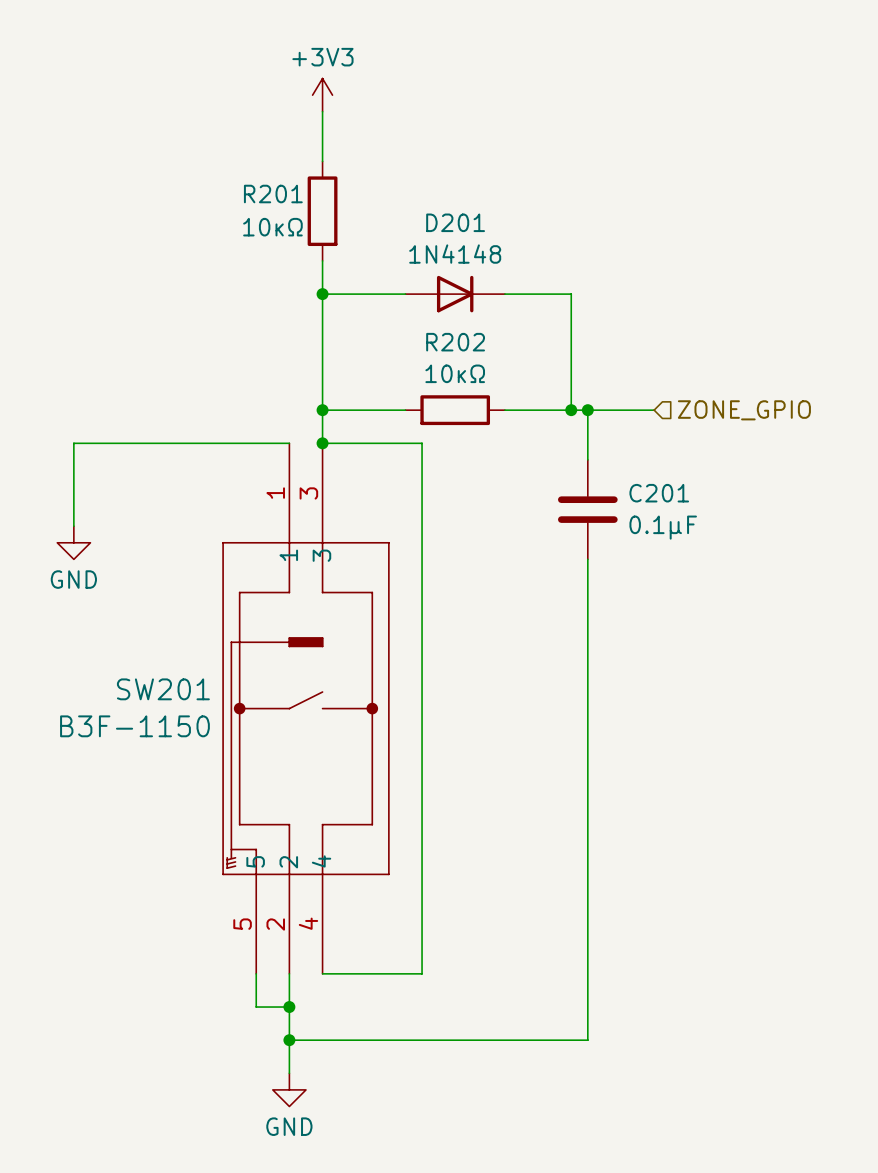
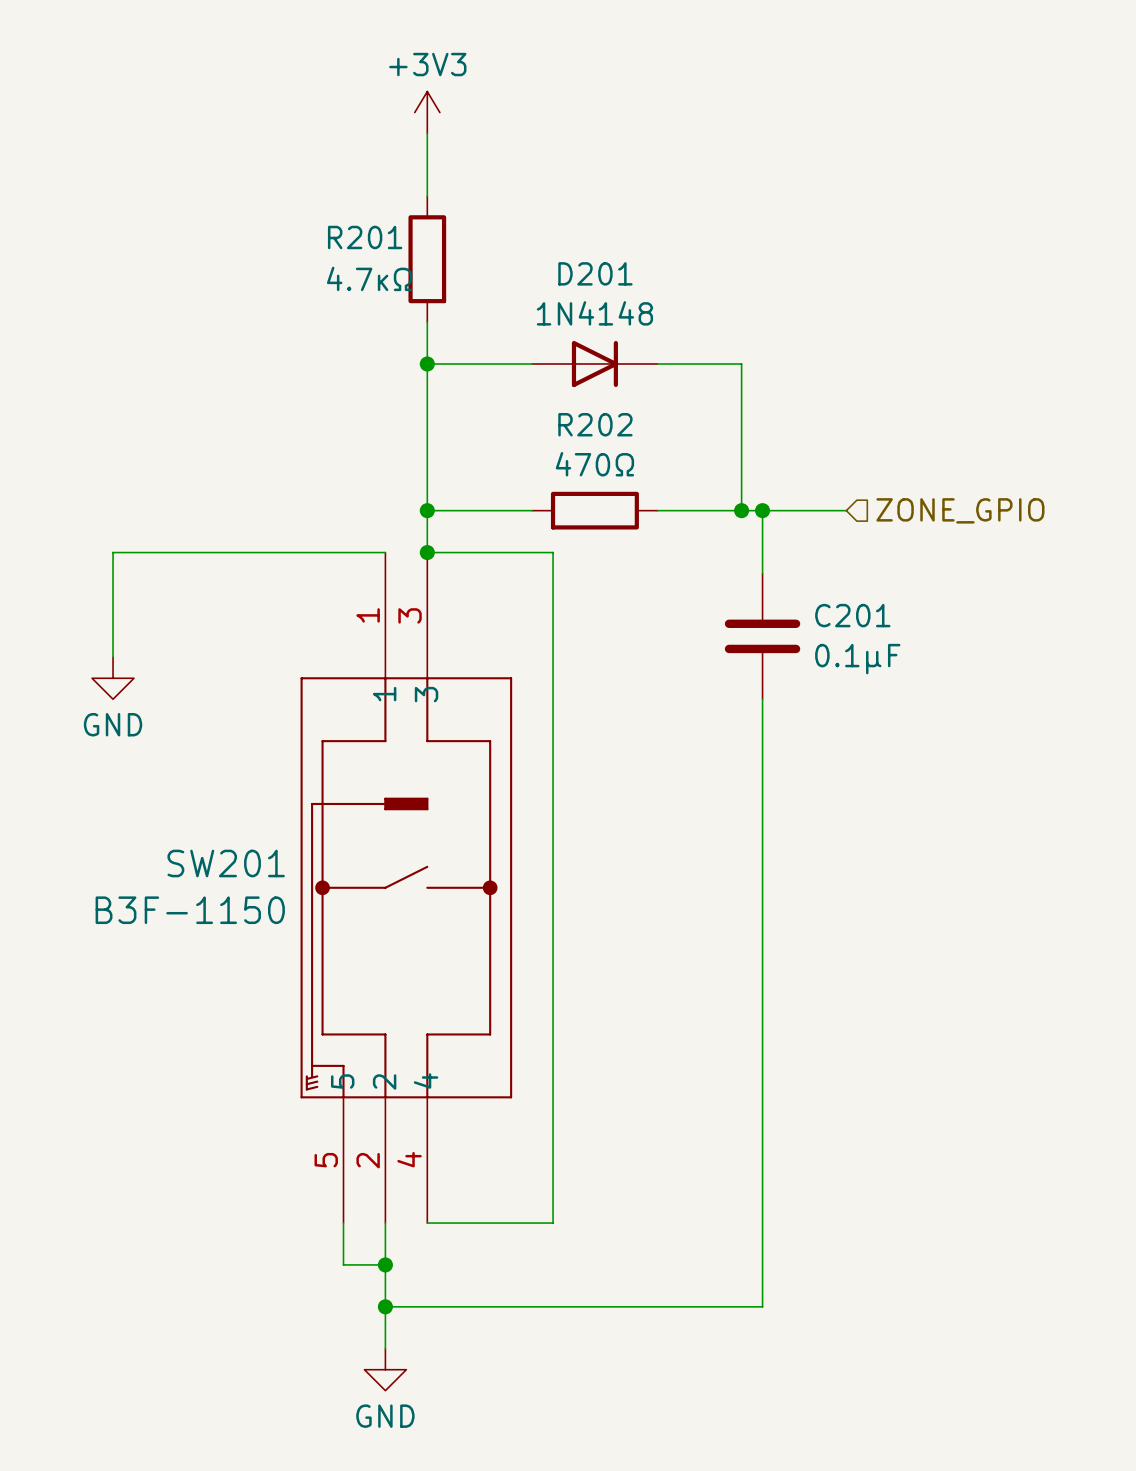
R201 value: 10κΩ (272, 227) -> 4.7κΩ (369, 278)
R202 value: 10κΩ (455, 373) -> 470Ω (594, 464)

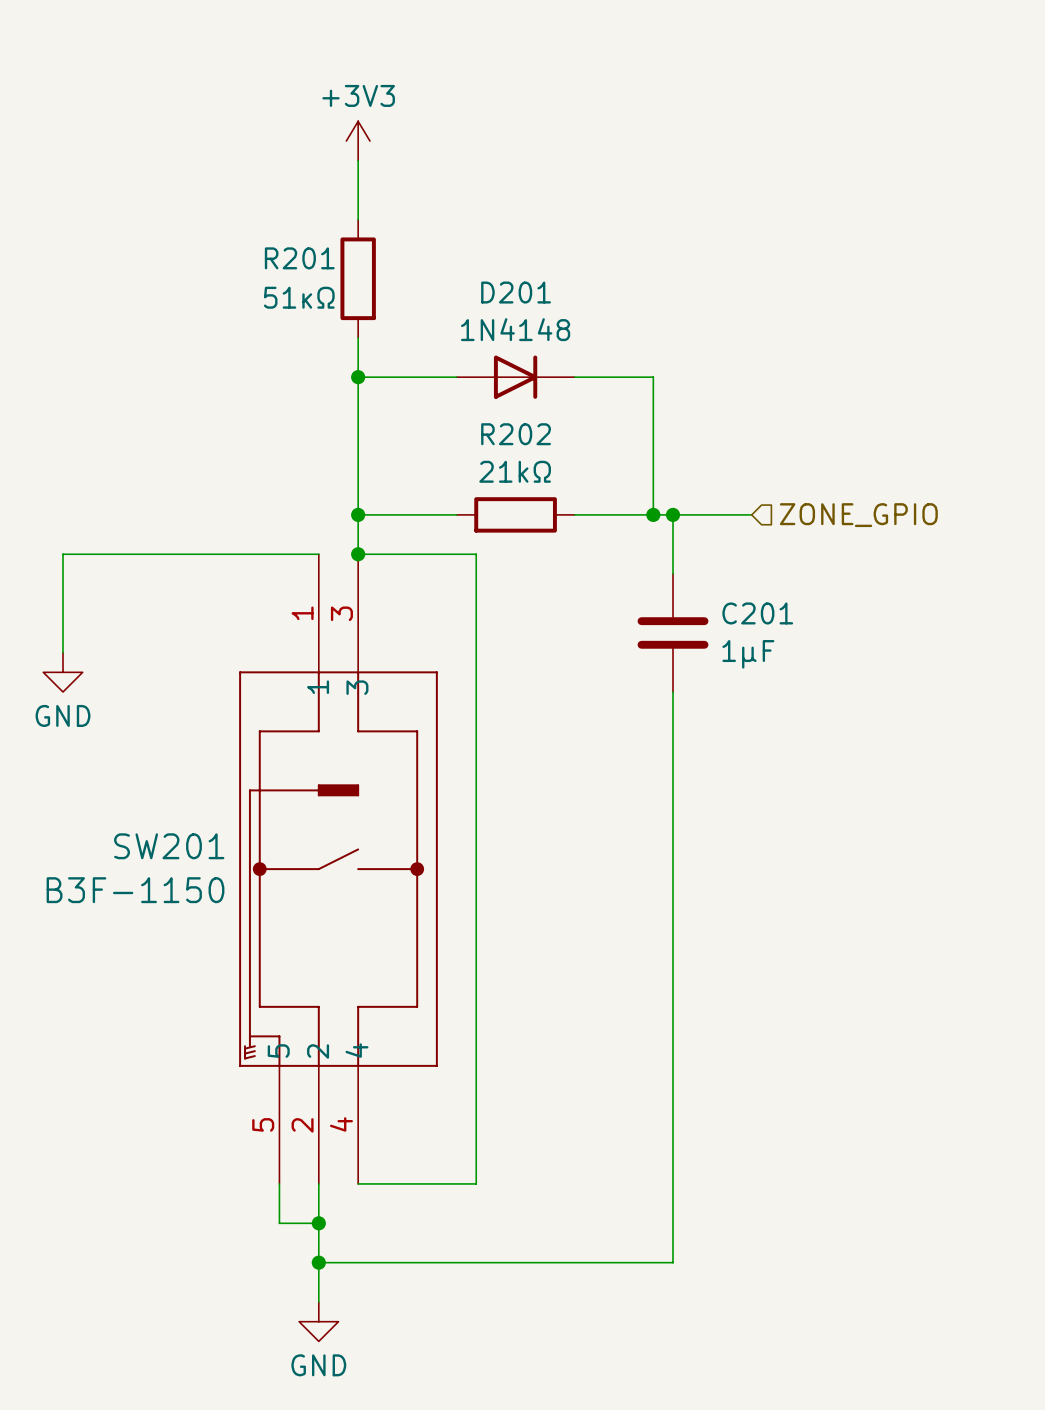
R201 value: 4.7κΩ (369, 278) -> 51κΩ (299, 297)
R202 value: 470Ω (594, 464) -> 21kΩ (515, 471)
C201 value: 0.1μF (857, 659) -> 1μF (748, 654)

